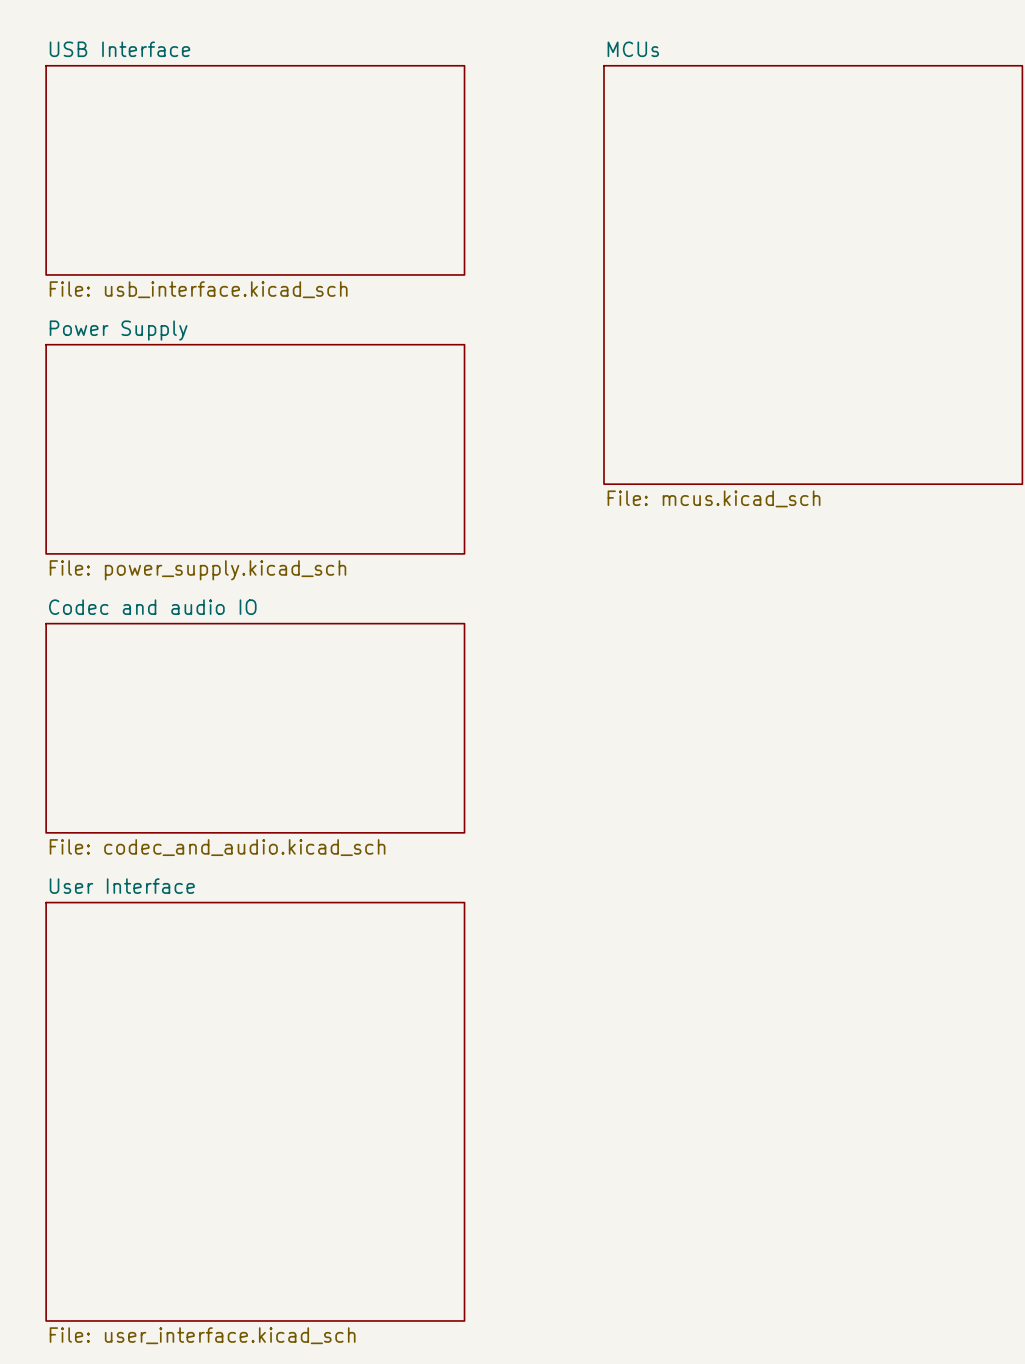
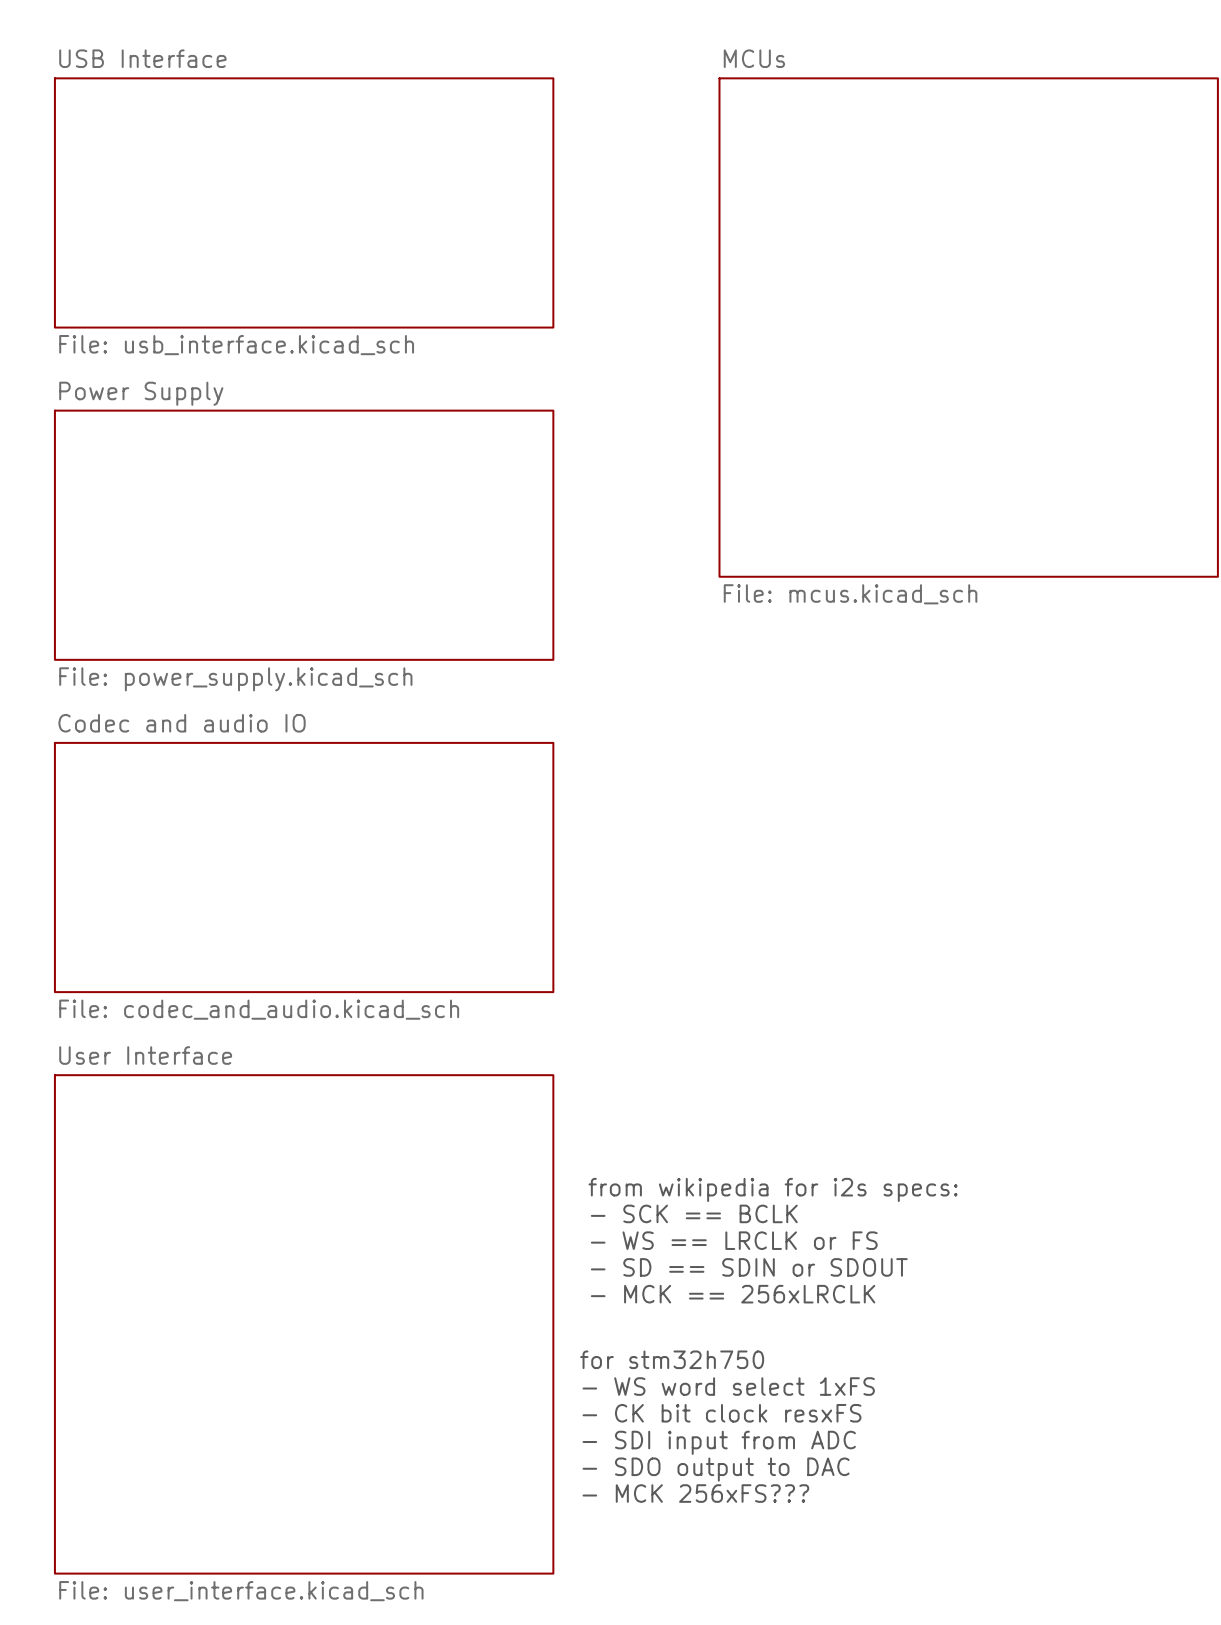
text: none -> from wikipedia for i2s specs: (773, 1189)
text: none -> - SCK == BCLK (694, 1213)
text: none -> - WS == LRCLK or FS (734, 1240)
text: none -> - SD == SDIN or SDOUT (749, 1267)
text: none -> - MCK == 256xLRCLK (733, 1294)
text: none -> for stm32h750 (672, 1359)
text: none -> - WS word select 1xFS (728, 1386)
text: none -> - CK bit clock resxFS (721, 1413)
text: none -> - SDI input from ADC (719, 1442)
text: none -> - SDO output to DAC (716, 1469)
text: none -> - MCK 256xFS??? (695, 1493)

